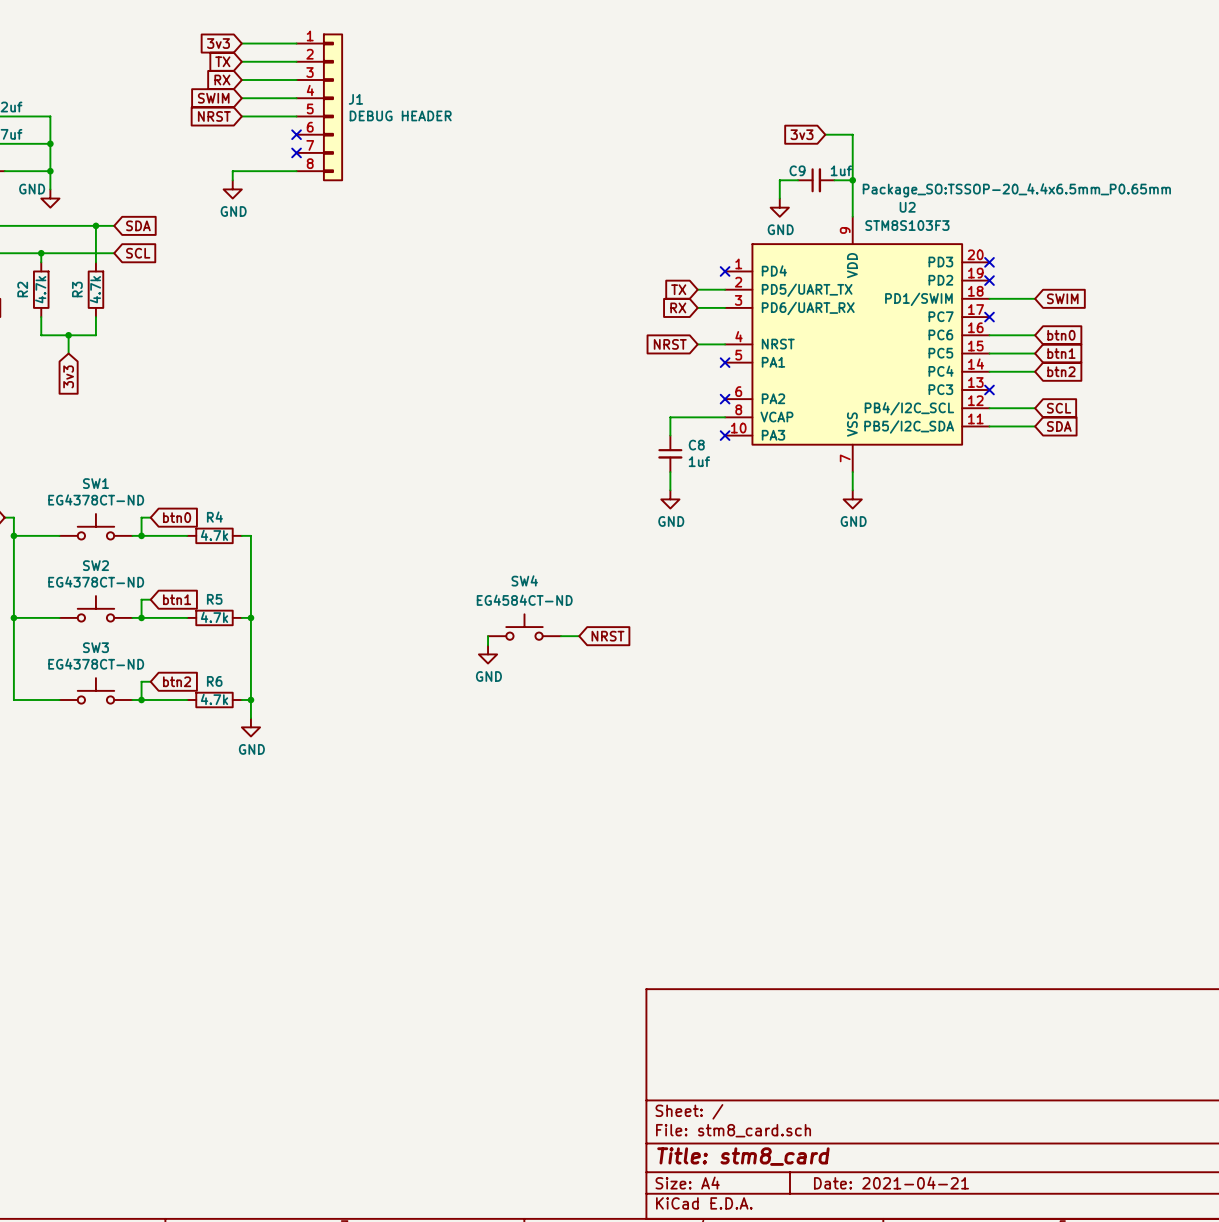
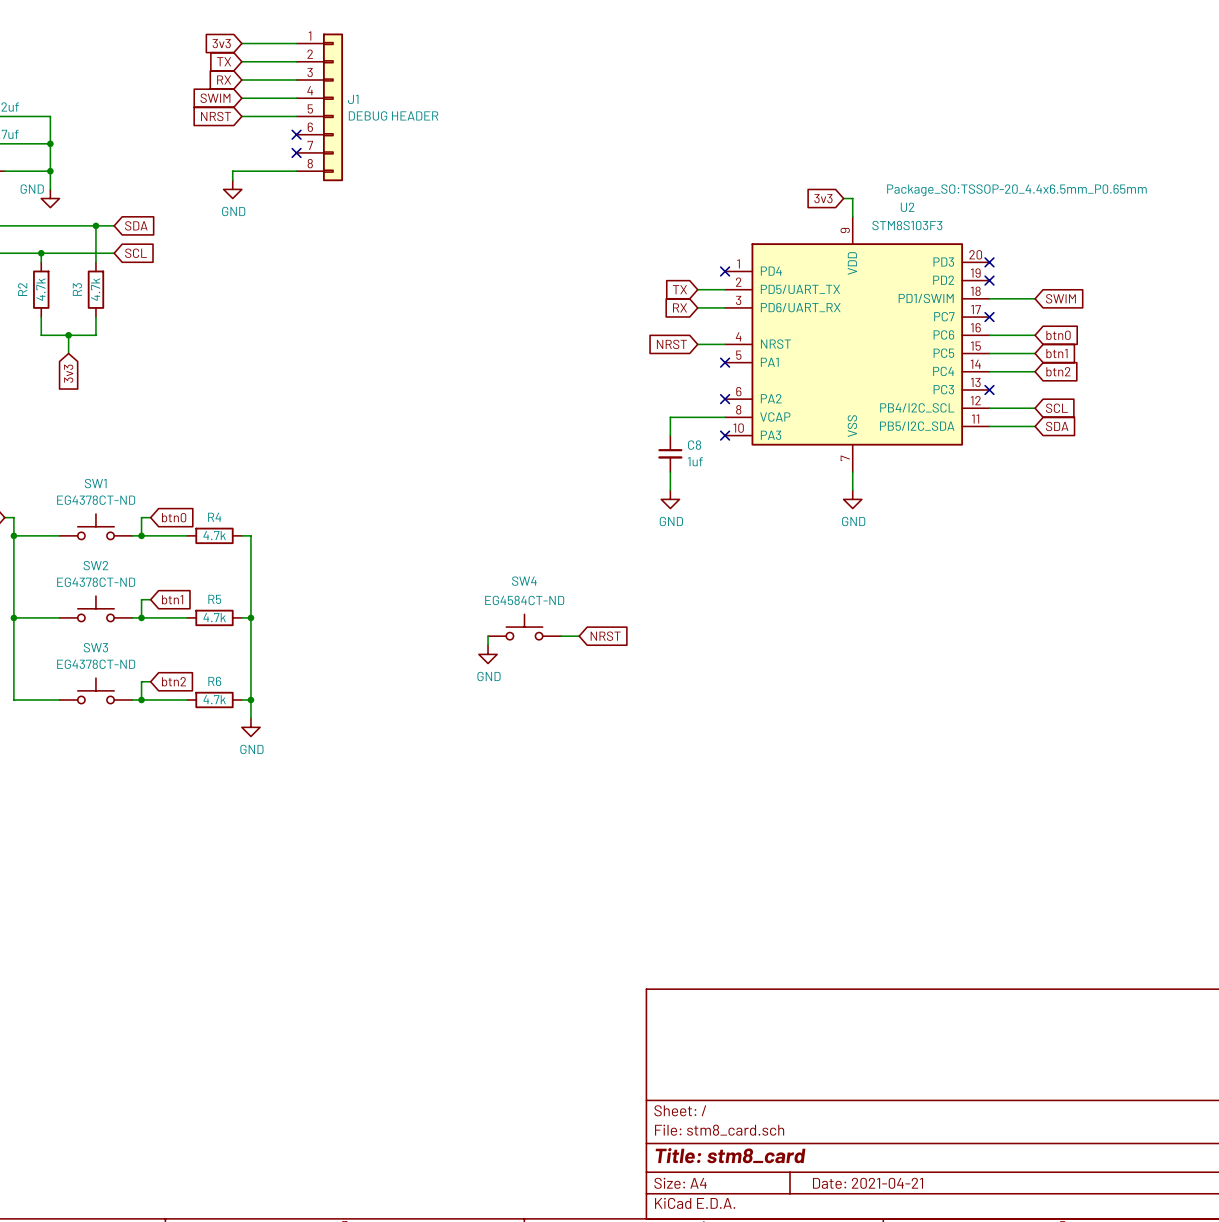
global label position: 3v3 (802, 134) -> 3v3 (823, 198)
wire: (825, 134) (852, 134) (852, 198) -> (843, 198) (852, 198)
wire: (798, 180) (779, 180) (779, 198) -> none
C9: 1uf (816, 180) -> none
wire: (834, 180) (852, 180) -> none
junction: (852, 180) -> none
power symbol: GND (779, 207) -> none

